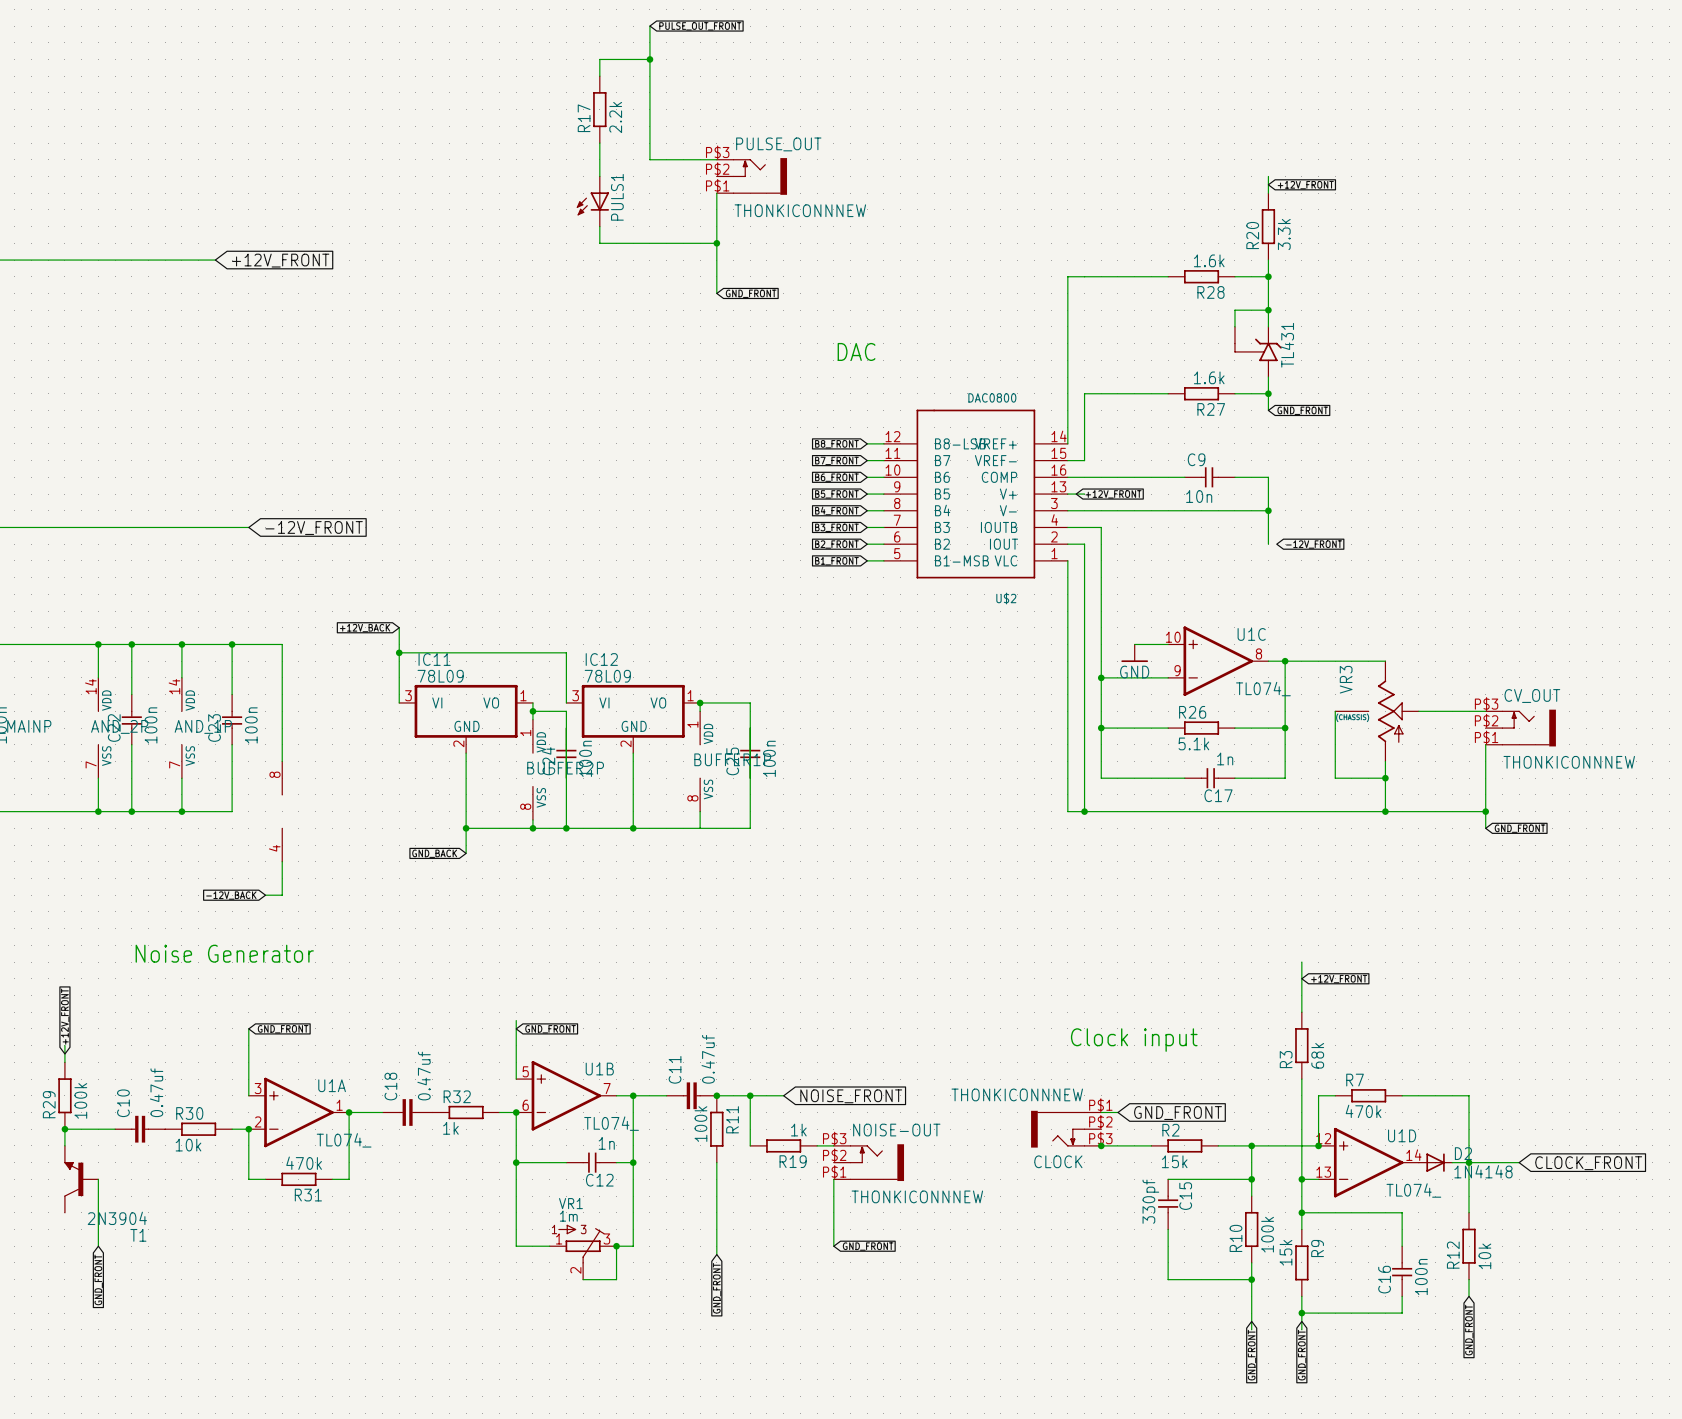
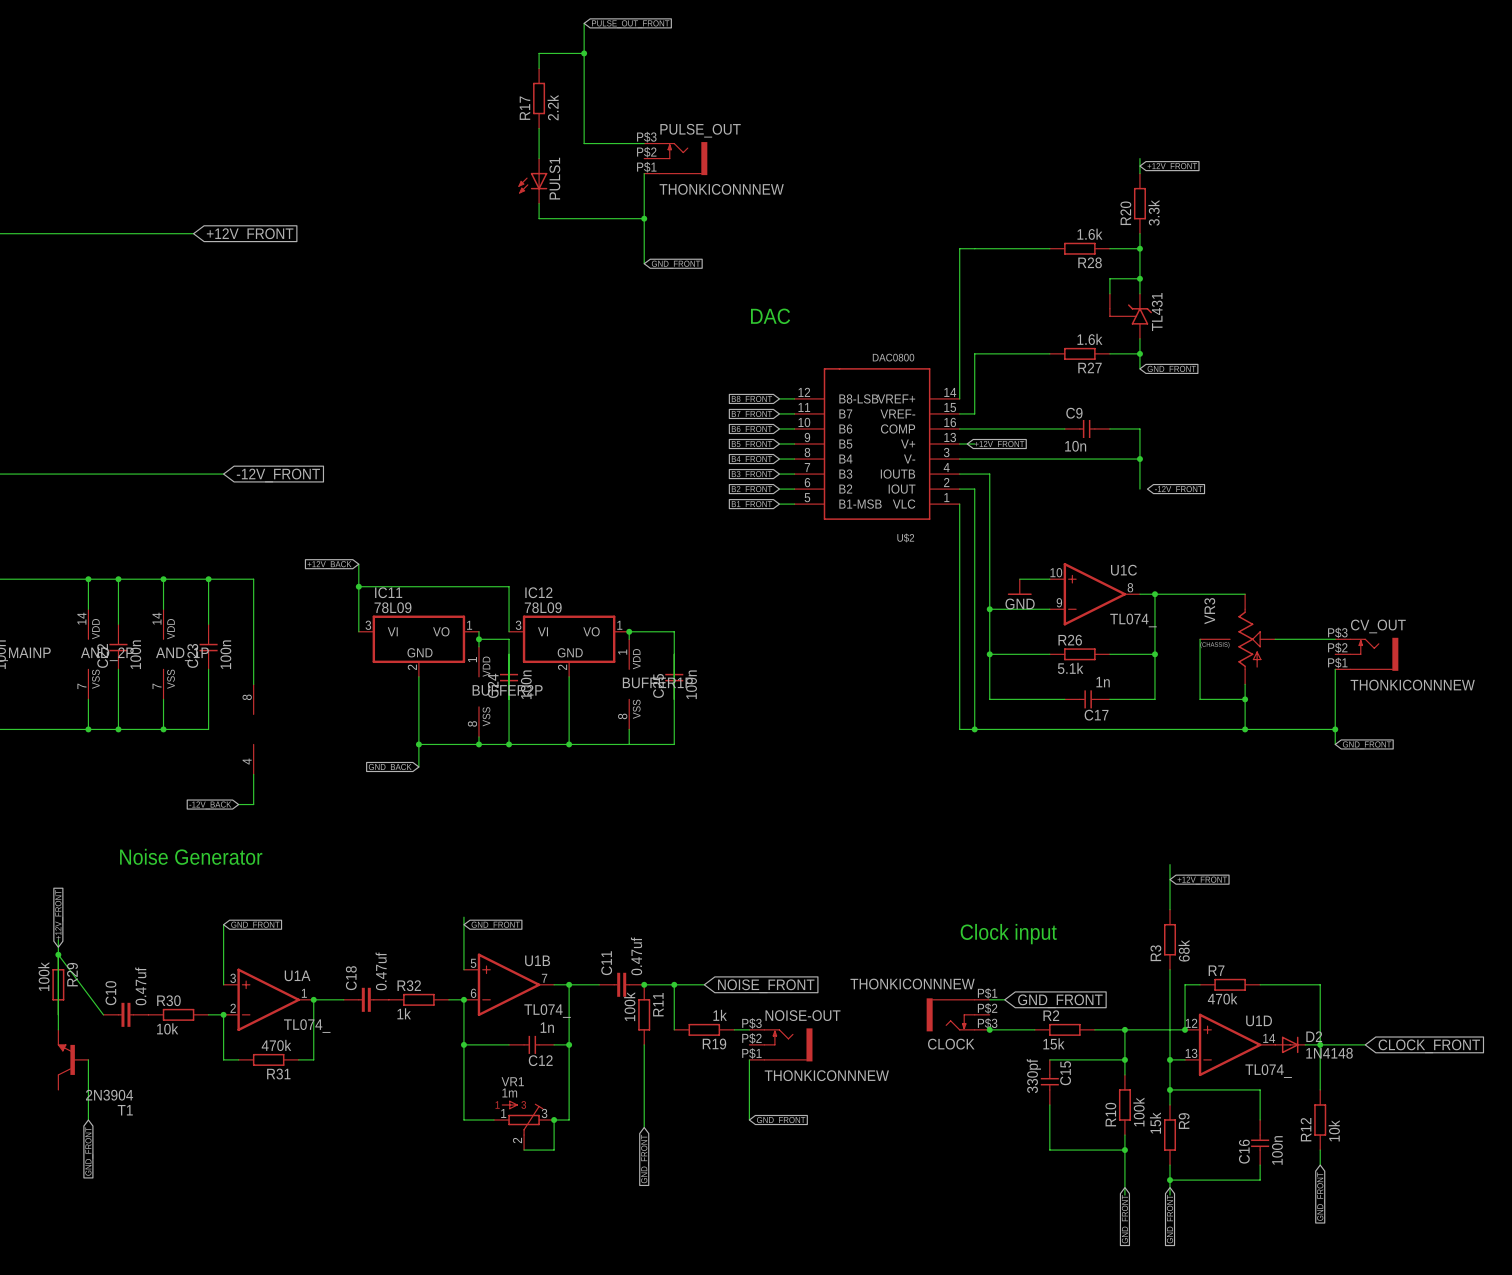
junction: none -> (58, 954)
R29 value position: 100k (80, 1100) -> 100k (43, 976)
R29 name position: R29 (49, 1104) -> R29 (72, 974)
wire: (64, 1129) (115, 1129) -> (58, 1014) (58, 954) (103, 1014)
junction: (64, 1129) -> none

